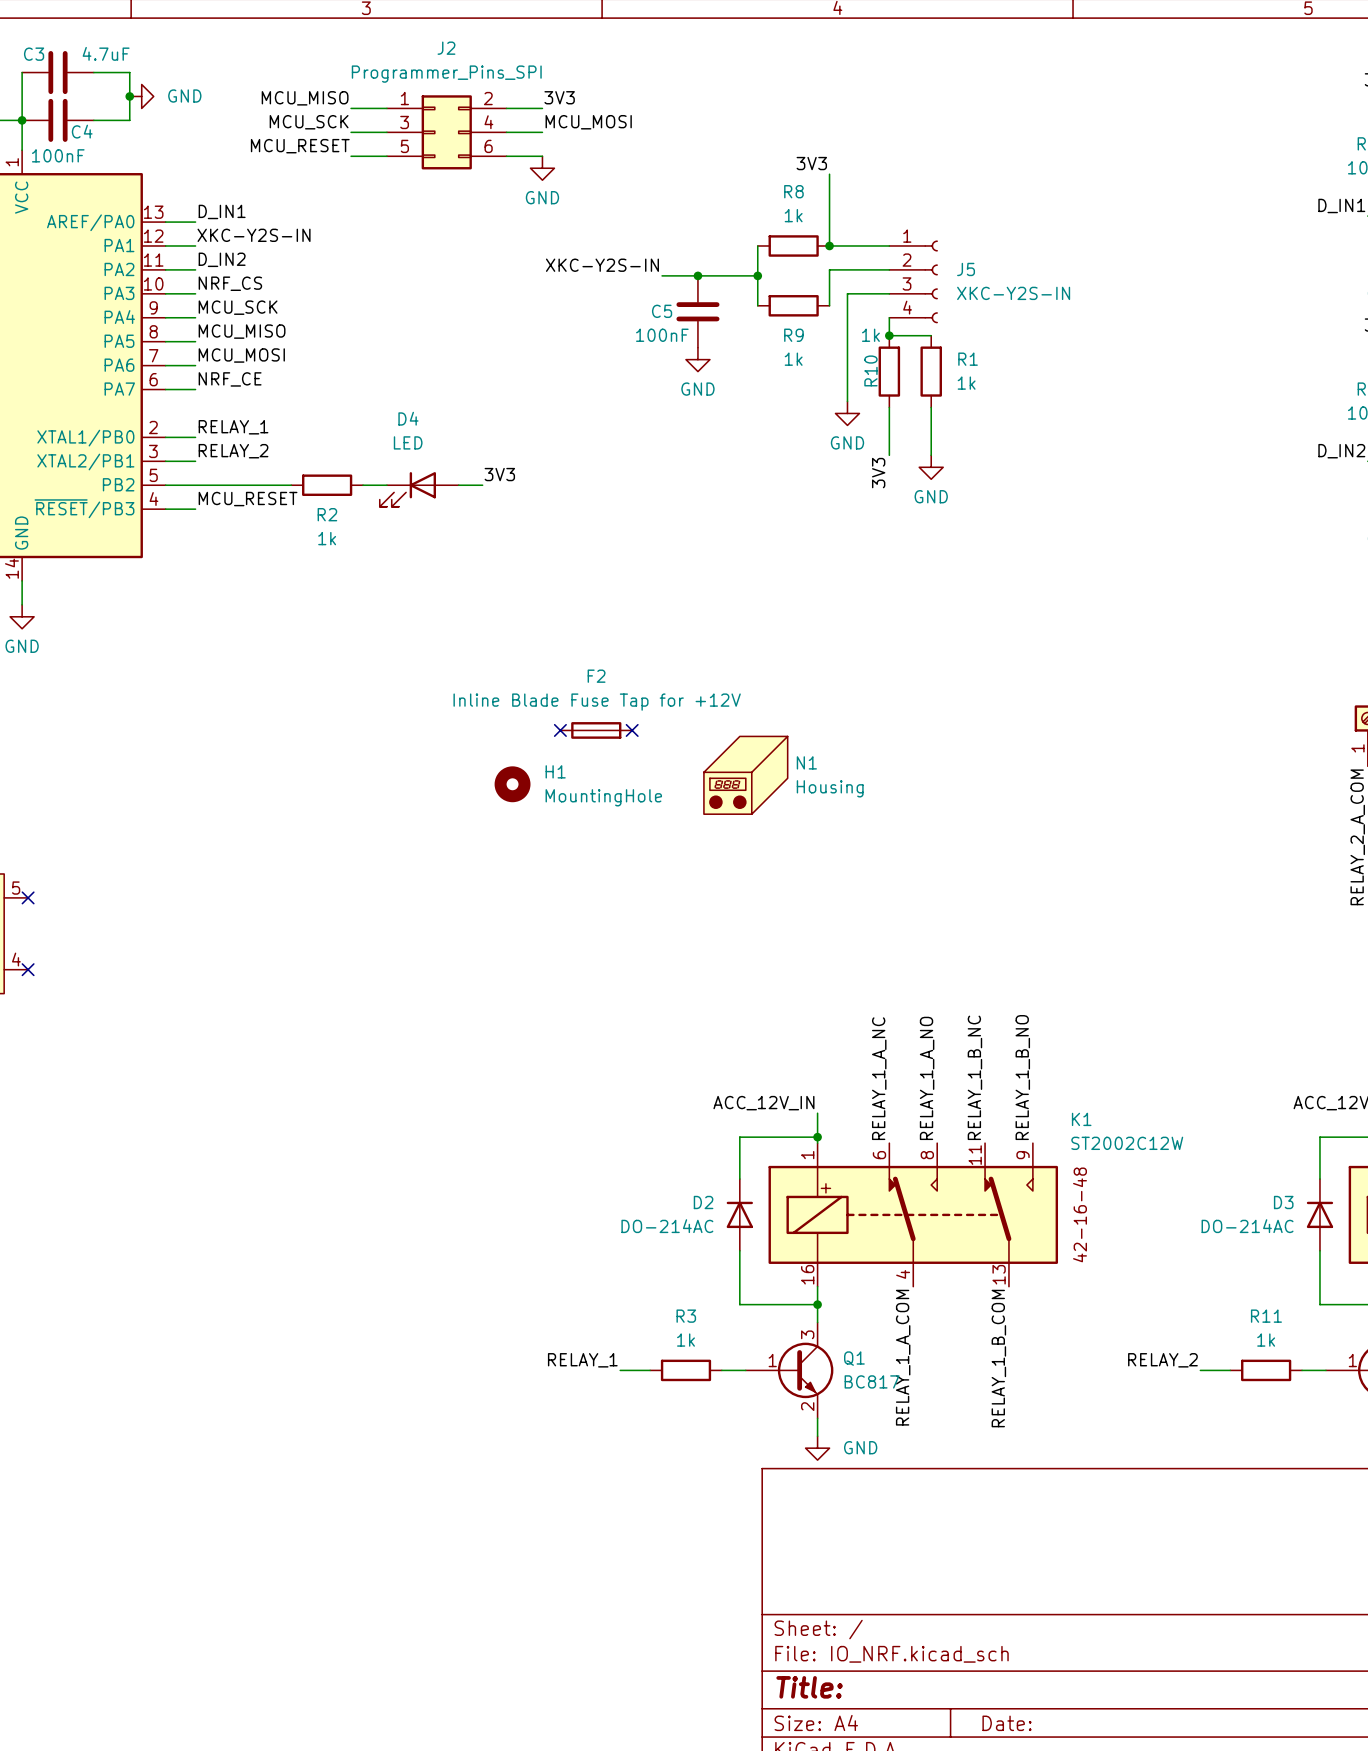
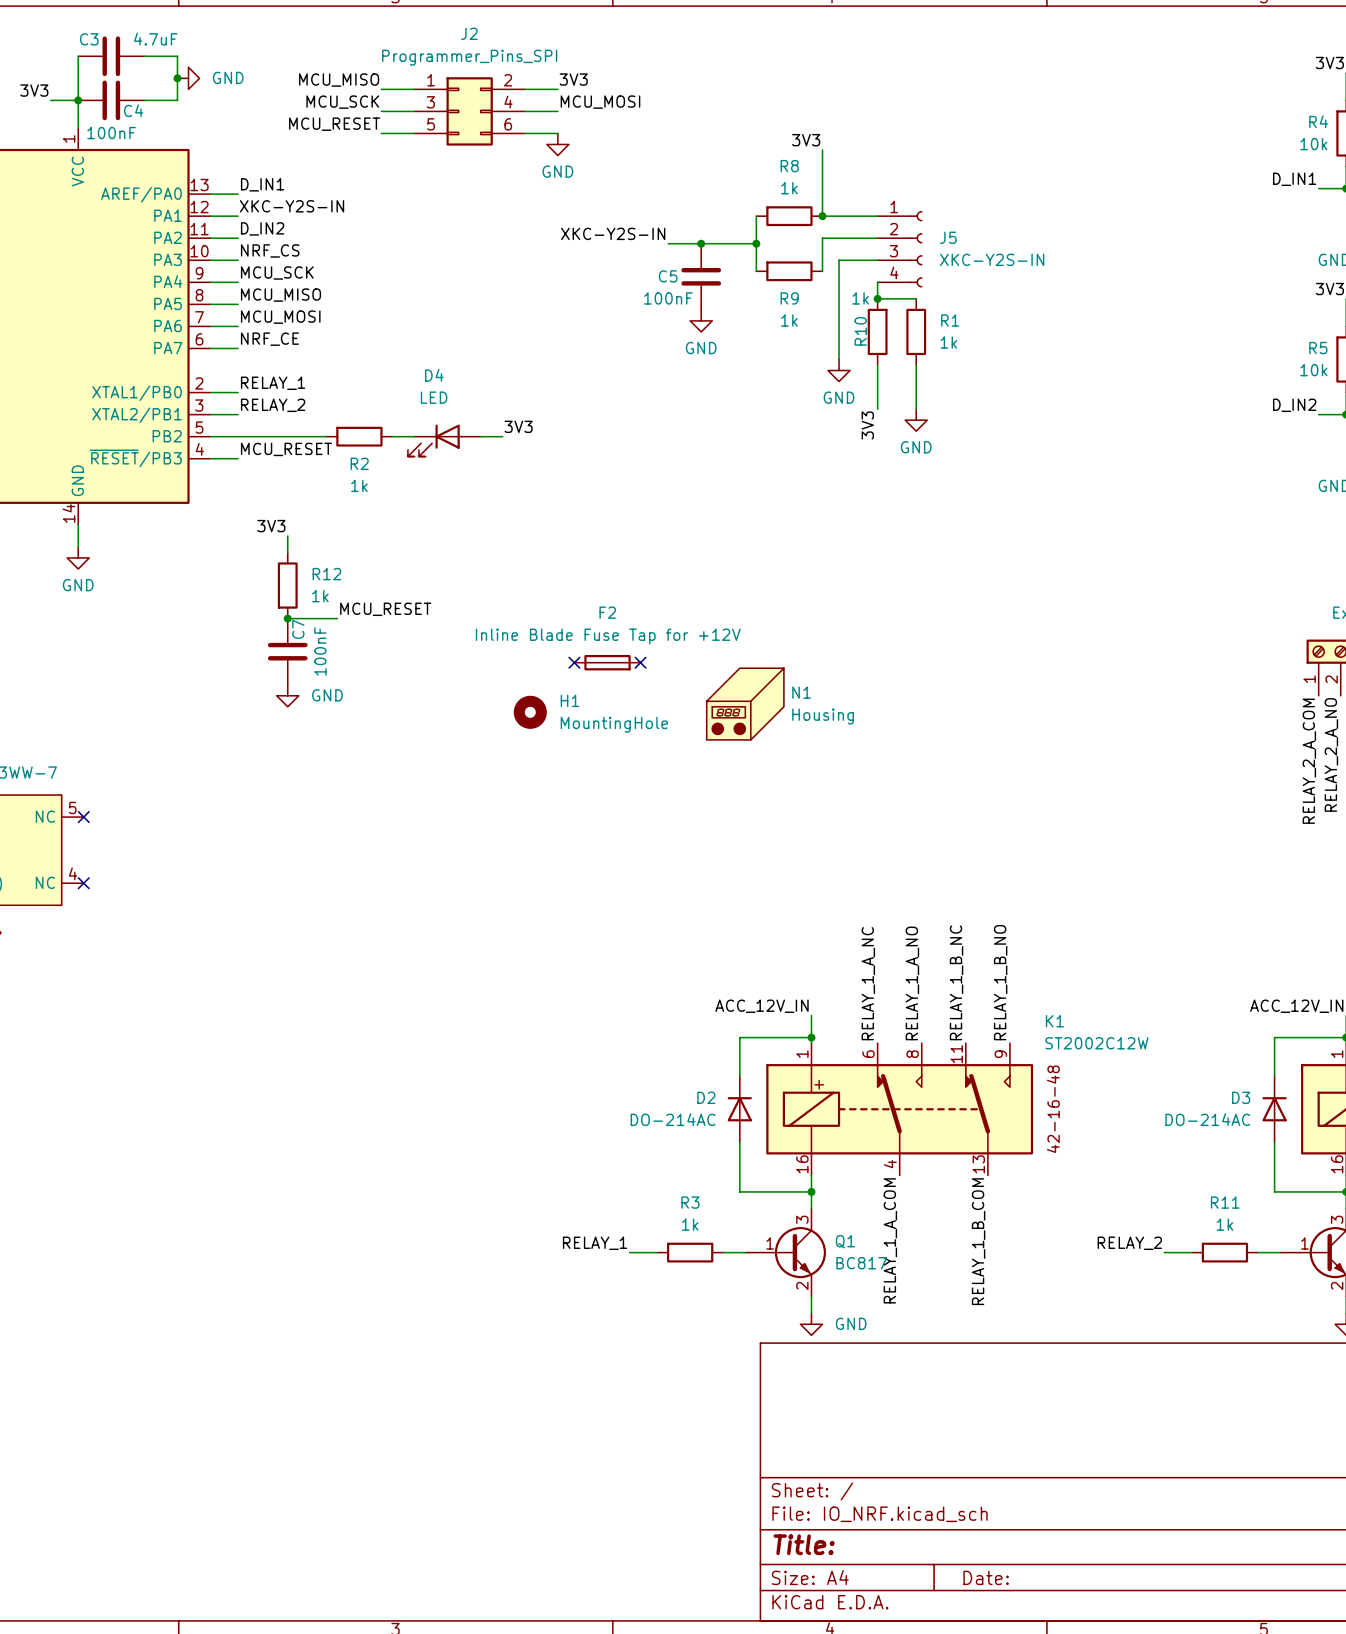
label: none -> 3V3 (271, 526)
wire: none -> (287, 535) (287, 552)
R12: none -> 1k (287, 585)
label: none -> MCU_RESET (385, 609)
wire: none -> (287, 618) (337, 618)
junction: none -> (287, 618)
C7: none -> 100nF (287, 651)
power symbol: none -> GND (287, 695)

